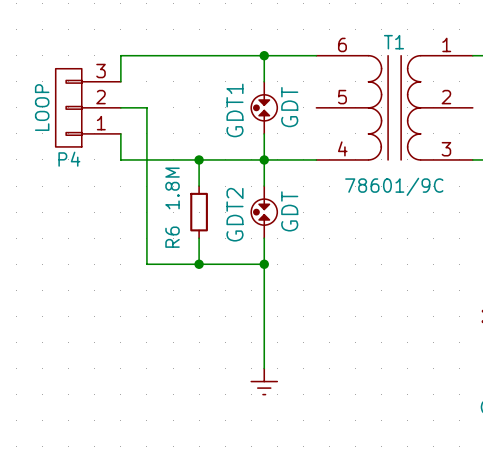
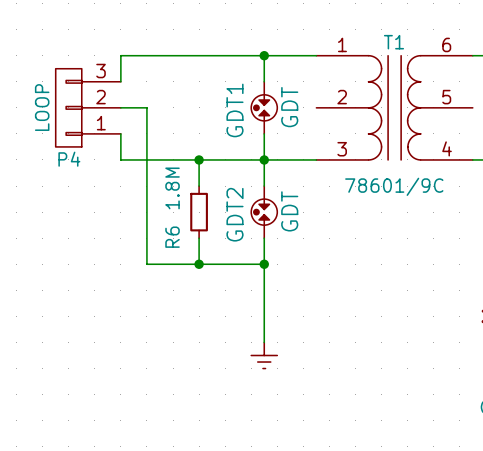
T1 flip: as is (394, 107) -> left-right (394, 107)
power symbol position: (264, 381) -> (264, 355)

